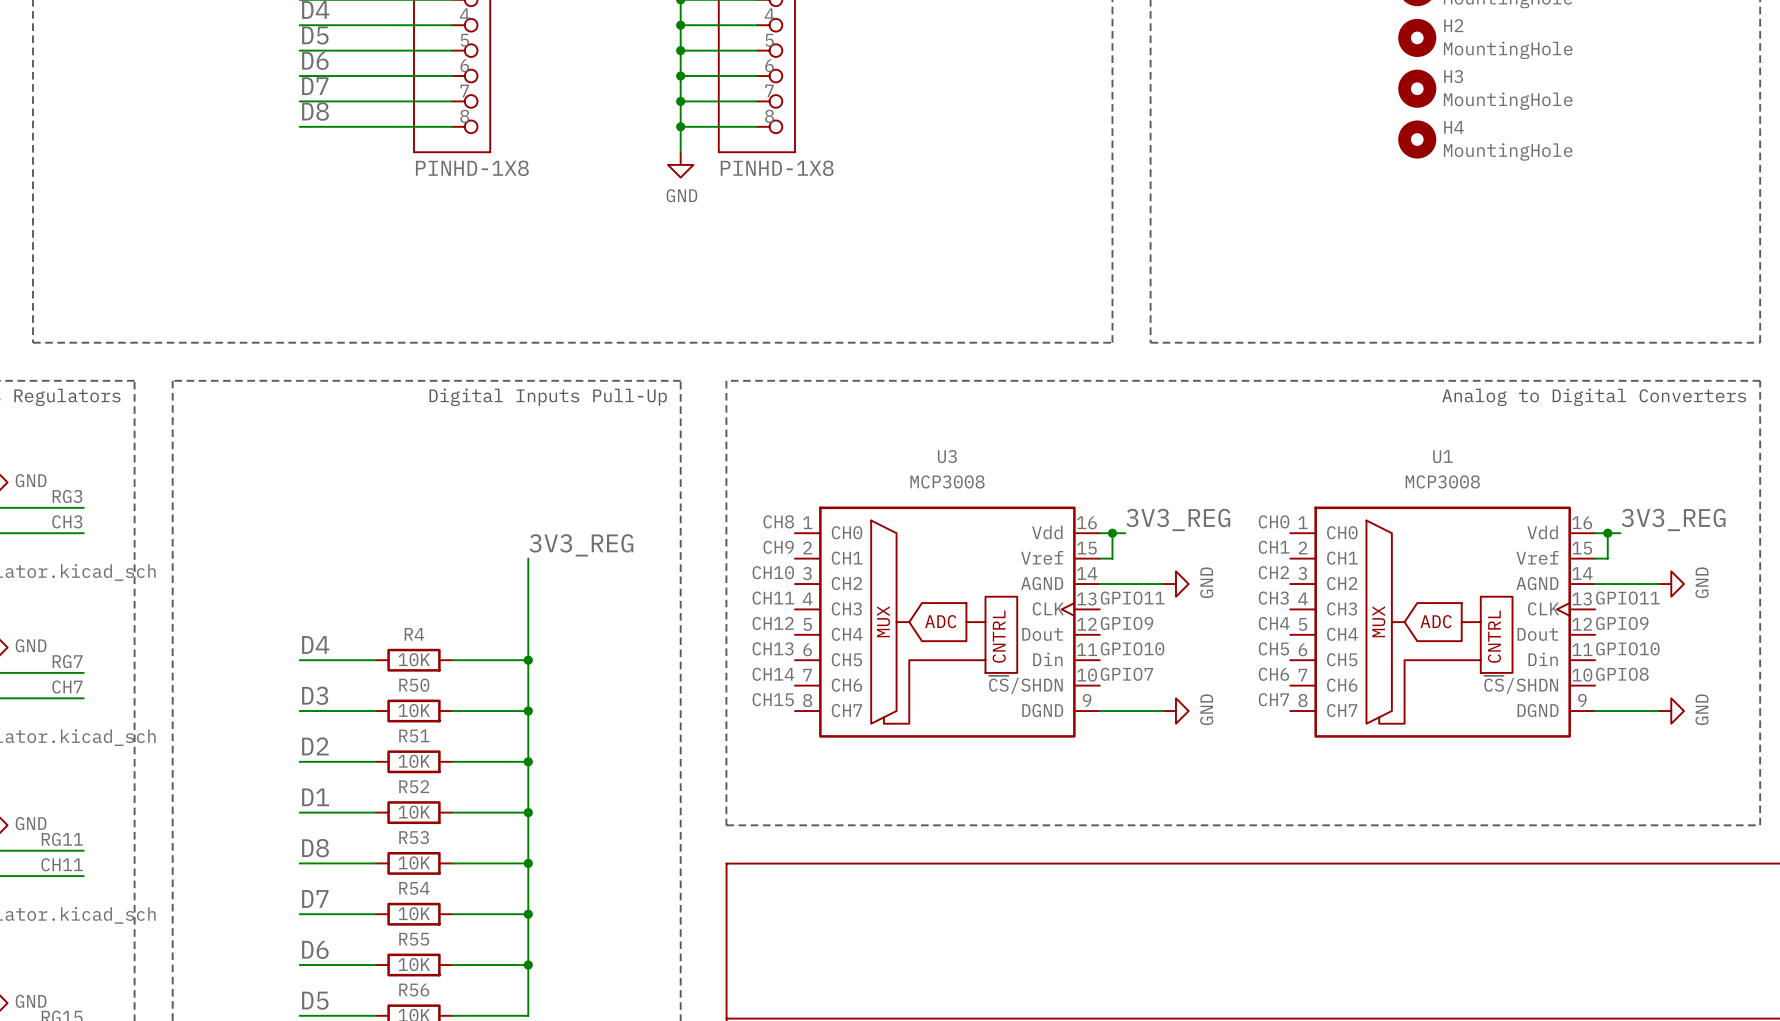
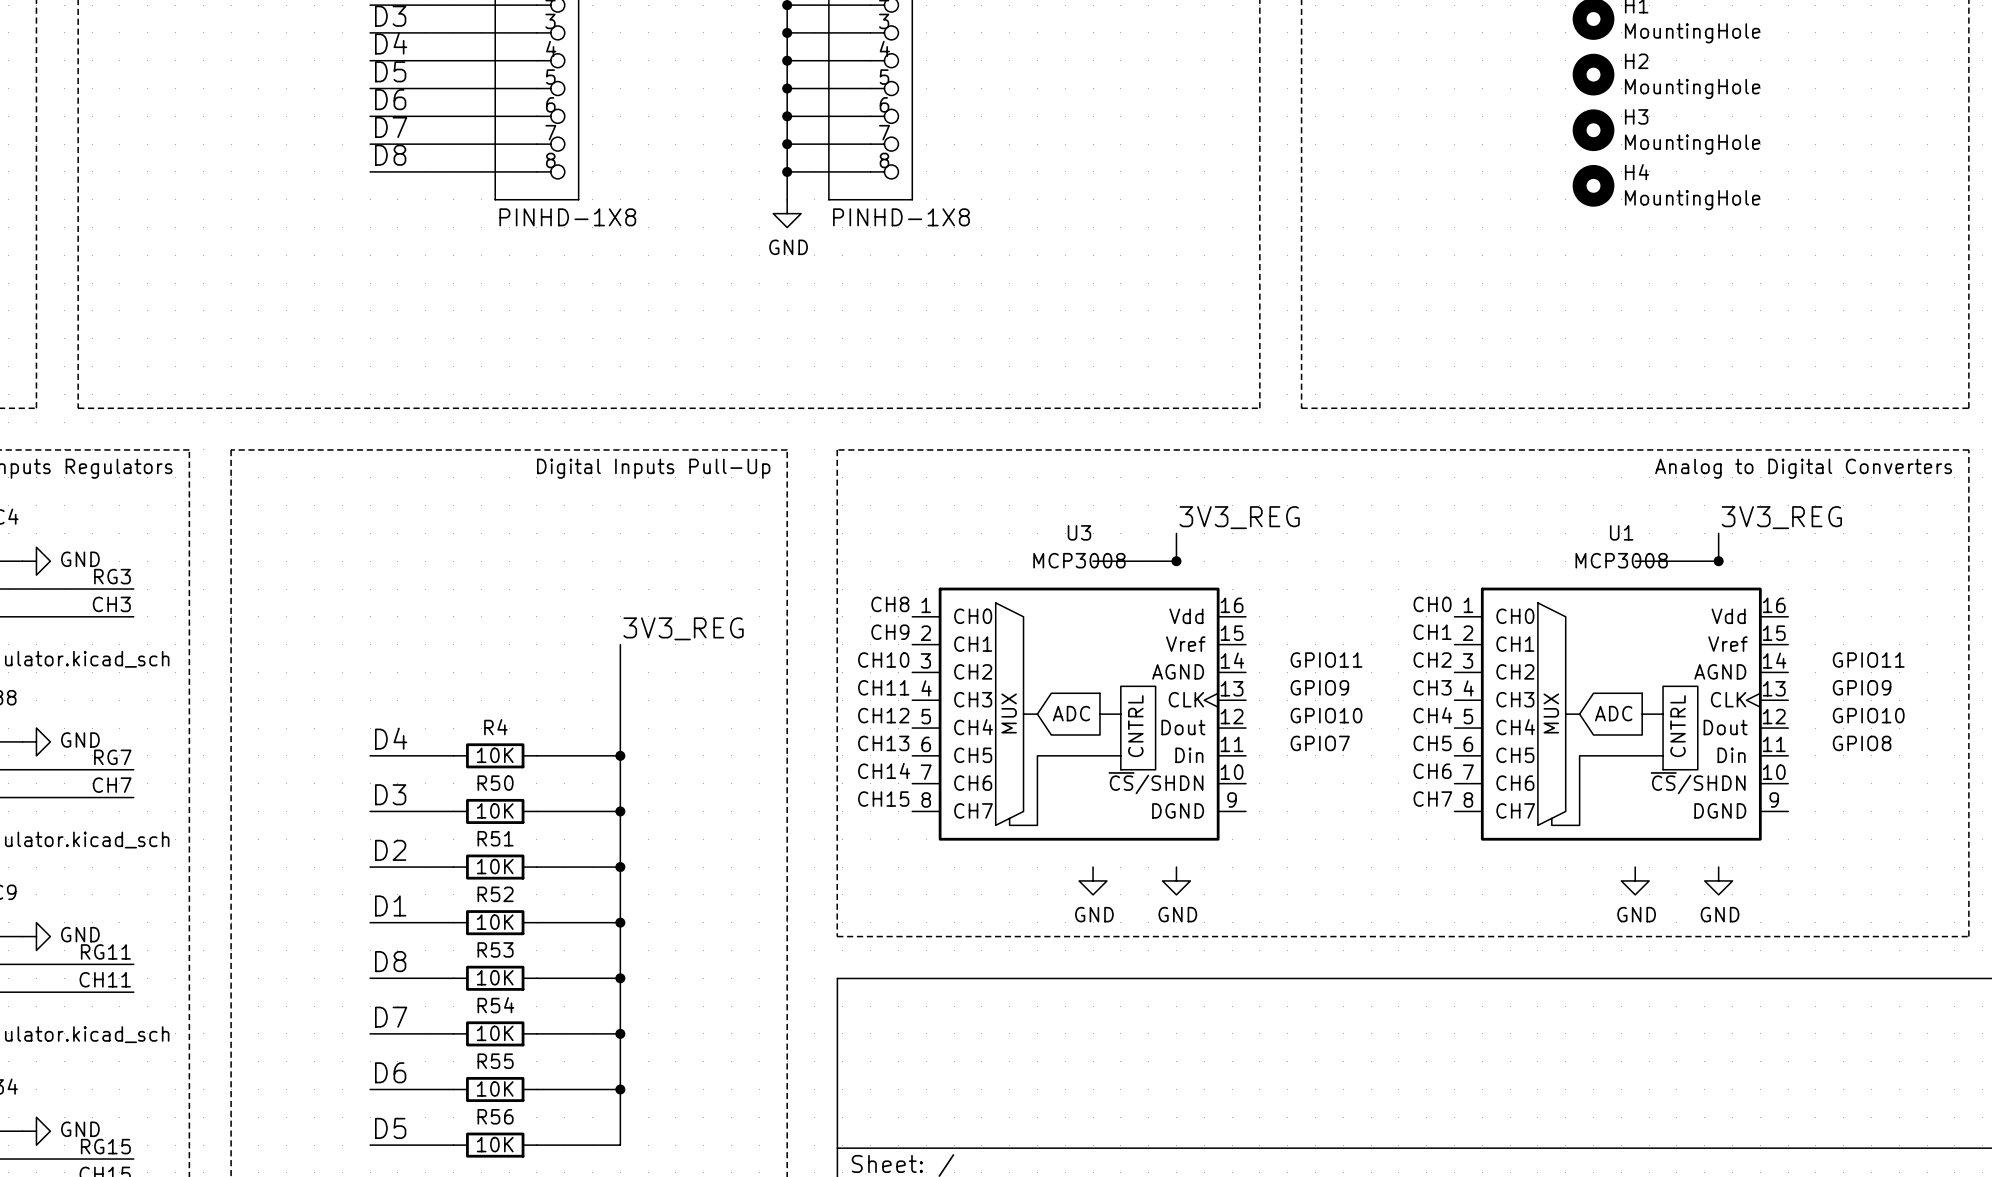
wire: none -> (1176, 533) (1176, 561) (1093, 561)
wire: none -> (1718, 533) (1718, 561) (1635, 561)
junction: none -> (1176, 561)
junction: none -> (1718, 561)
label position: 3V3_REG (1178, 519) -> 3V3_REG (1239, 517)
label position: 3V3_REG (1673, 519) -> 3V3_REG (1781, 517)
wire: (1099, 533) (1125, 533) -> none
wire: (1112, 533) (1112, 558) (1099, 558) -> none
junction: (1112, 533) -> none
wire: (1595, 533) (1620, 533) -> none
wire: (1607, 533) (1607, 558) (1595, 558) -> none
junction: (1607, 533) -> none
wire: (1099, 584) (1163, 584) -> none
power symbol: GND (1175, 584) -> none
wire: (1595, 584) (1658, 584) -> none
power symbol: GND (1671, 584) -> none
label position: GPIO11 (1132, 598) -> GPIO11 (1326, 660)
label position: GPIO11 (1627, 598) -> GPIO11 (1868, 660)
label position: GPIO9 (1127, 623) -> GPIO9 (1319, 687)
label position: GPIO9 (1622, 623) -> GPIO9 (1862, 687)
label position: GPIO10 (1132, 648) -> GPIO10 (1326, 715)
label position: GPIO10 (1627, 648) -> GPIO10 (1868, 715)
label position: GPIO7 (1126, 674) -> GPIO7 (1320, 743)
label position: GPIO8 (1622, 674) -> GPIO8 (1862, 743)
wire: (1099, 711) (1163, 711) -> none
power symbol: GND (1175, 711) -> none
wire: (1595, 711) (1658, 711) -> none
power symbol: GND (1671, 711) -> none
power symbol: none -> GND (1093, 880)
power symbol: none -> GND (1176, 880)
power symbol: none -> GND (1635, 880)
power symbol: none -> GND (1718, 880)

